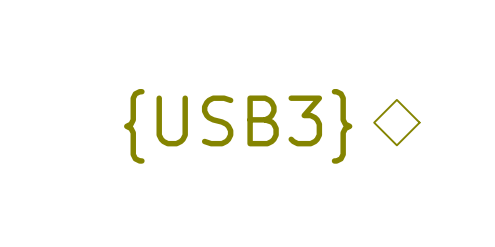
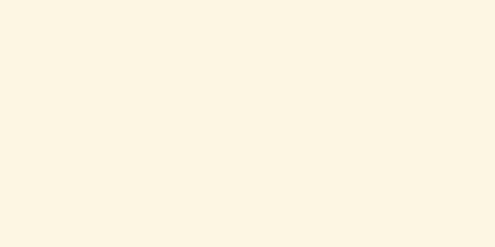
hierarchical label: {USB3} (238, 126) -> none

